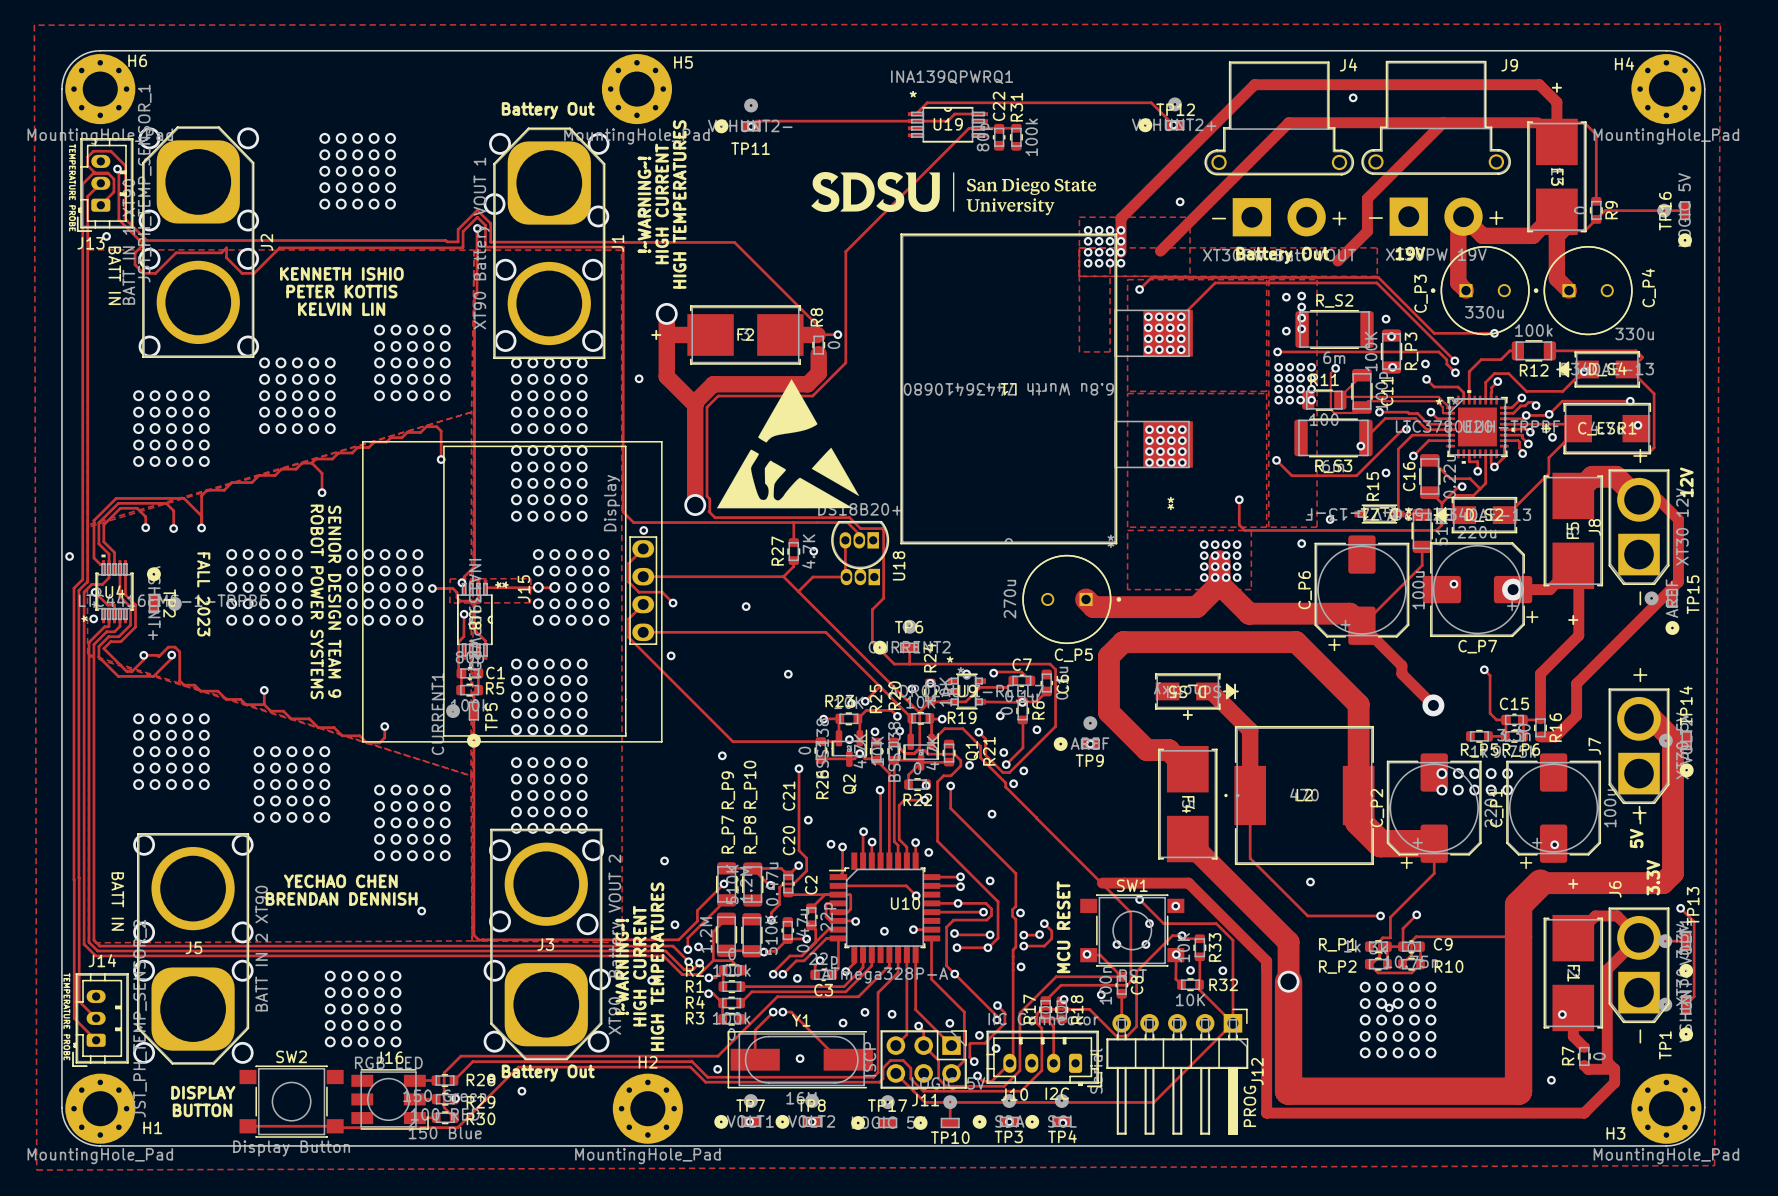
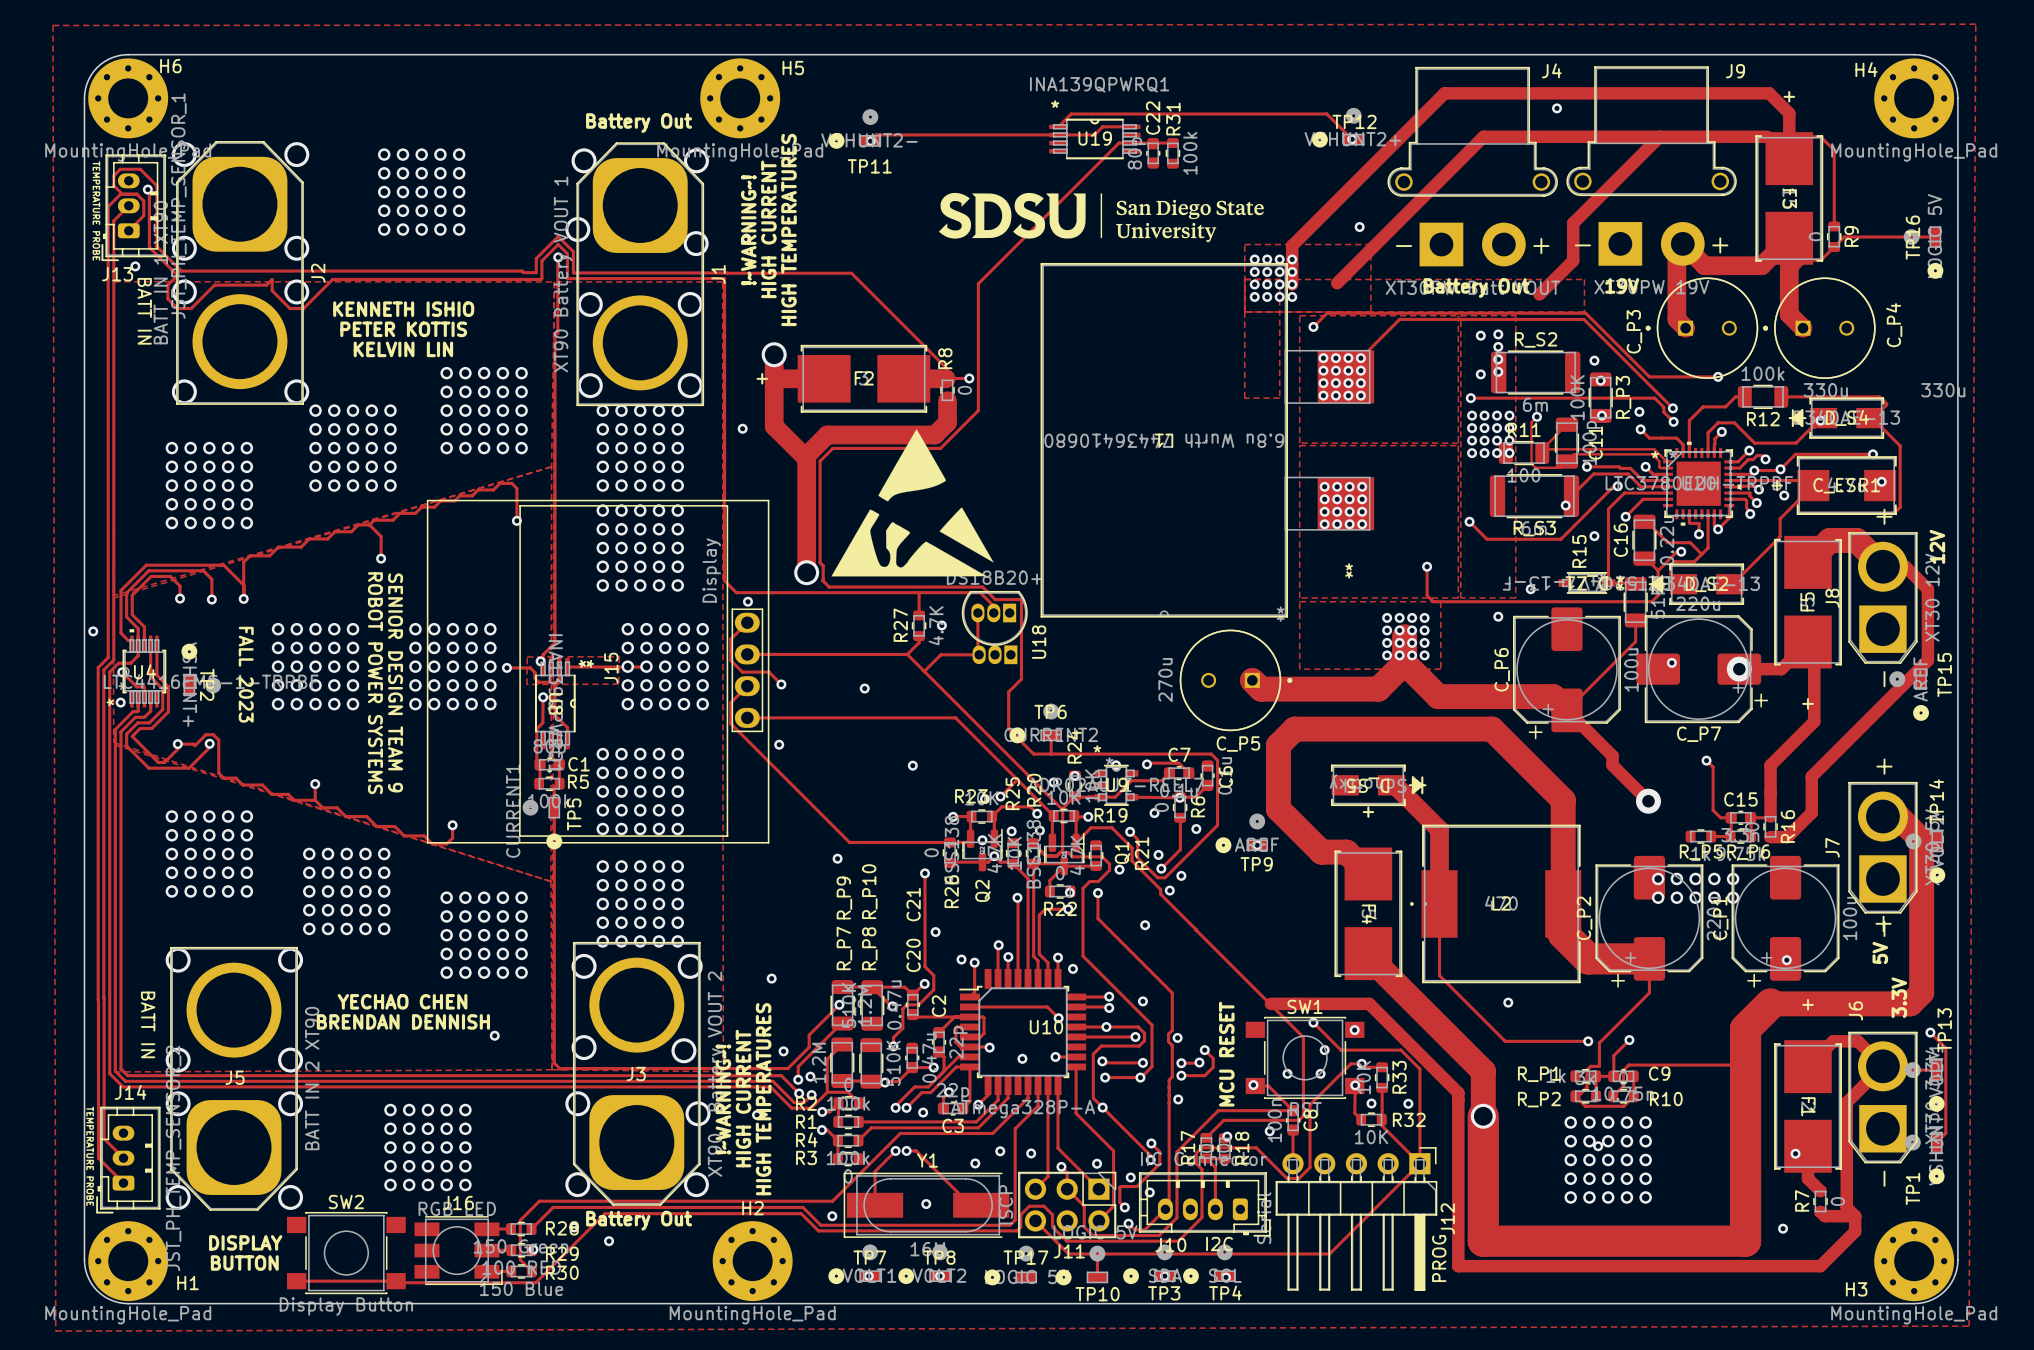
C_P3 value position: 330u (1484, 312) -> 330u (1825, 390)
C_P4 value position: 330u (1634, 333) -> 330u (1943, 390)

